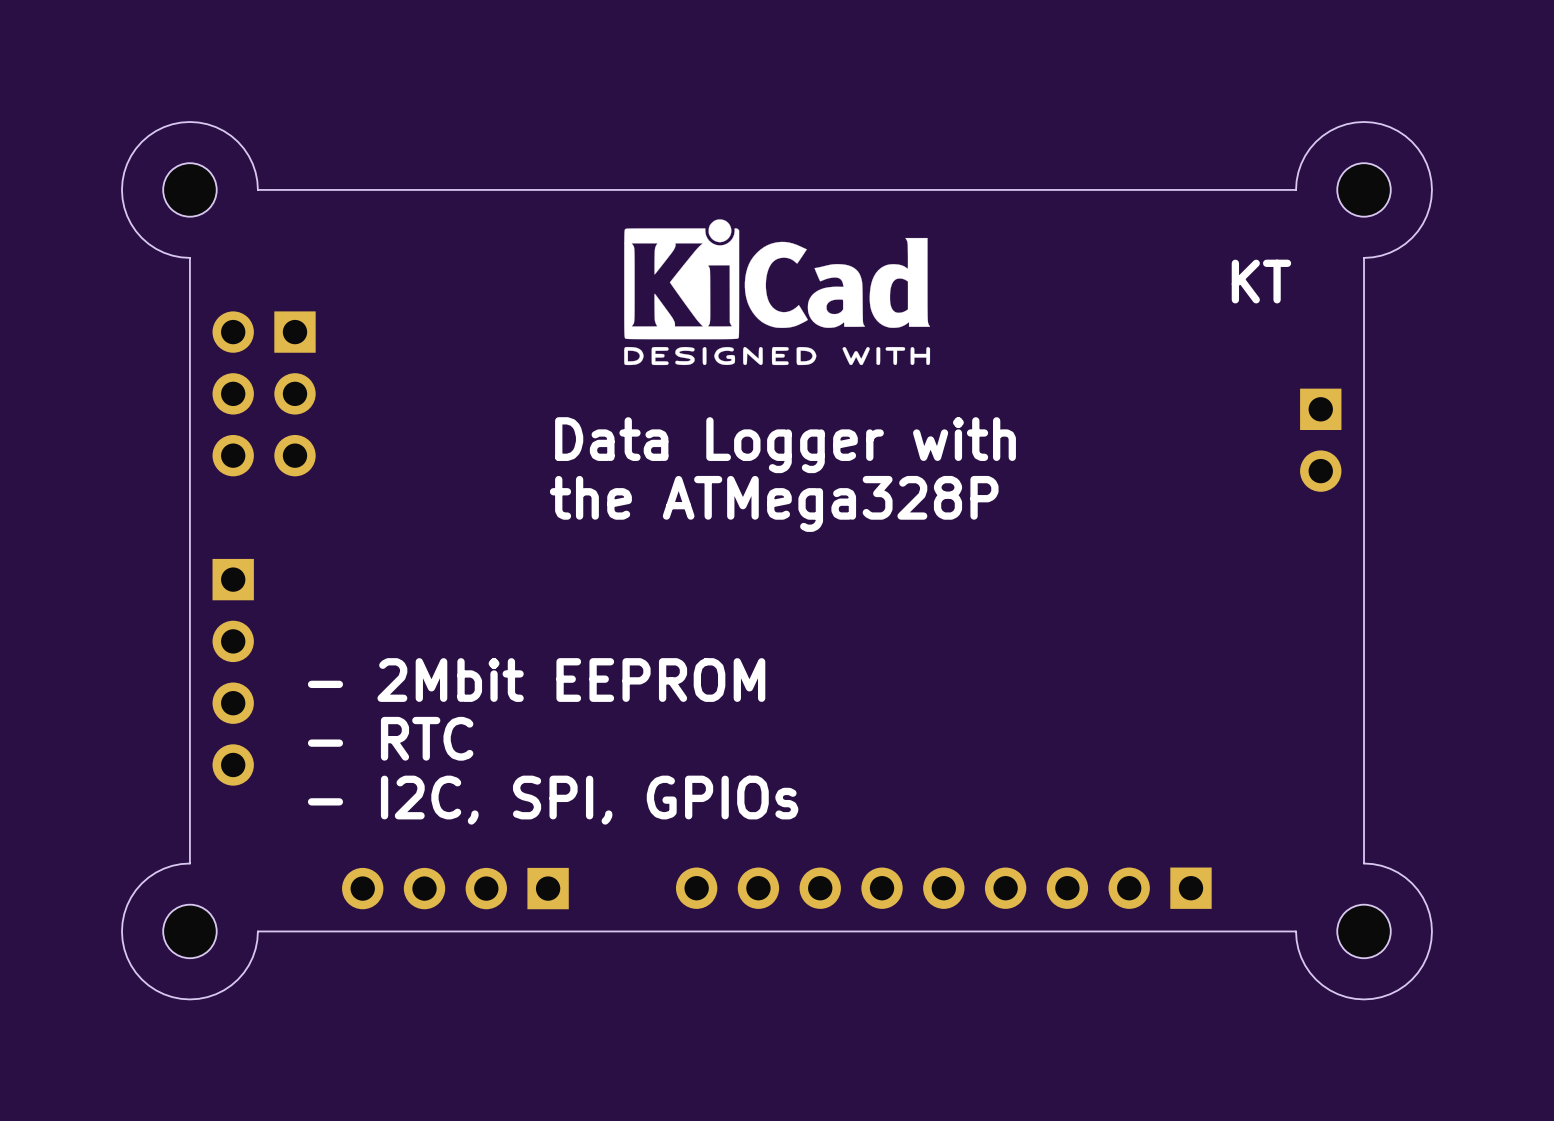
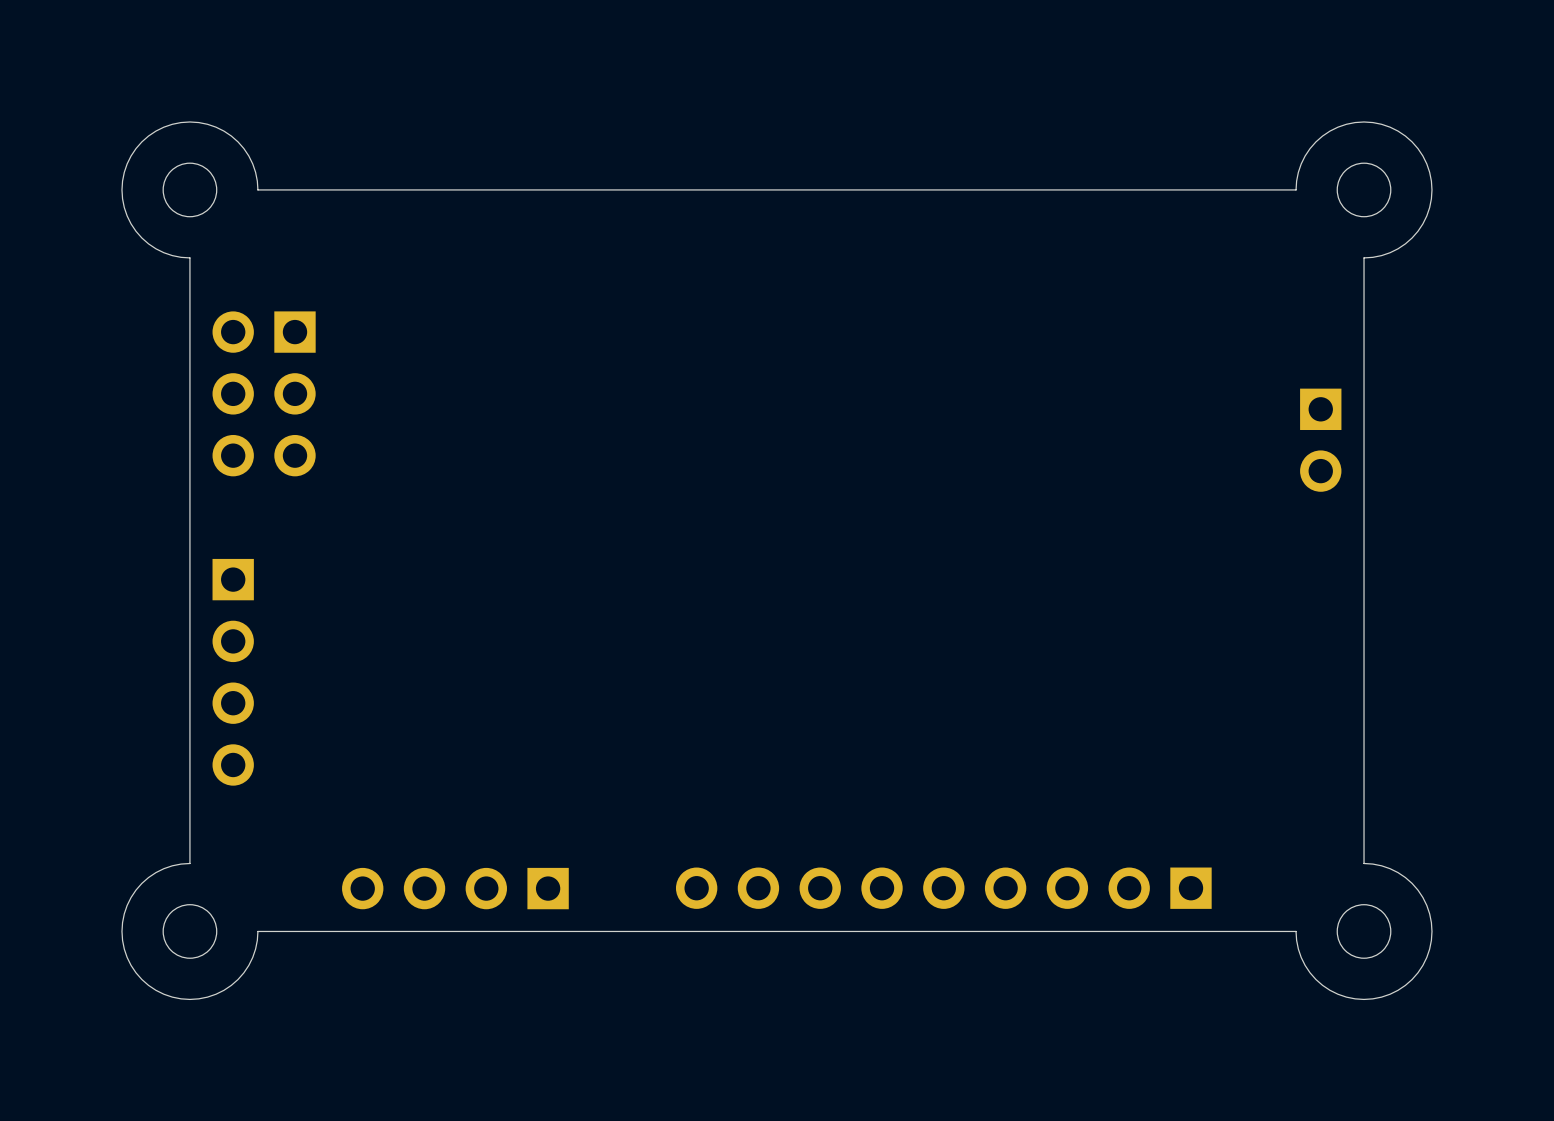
drawing: [624, 219, 931, 366] -> none
text: KT (1261, 281) -> none
text: Data Logger with (785, 445) -> none
text: the ATMega328P (774, 503) -> none
text: - 2Mbit EEPROM (536, 680) -> none
text: - RTC (390, 738) -> none
text: - I2C, SPI, GPIOs (553, 800) -> none

